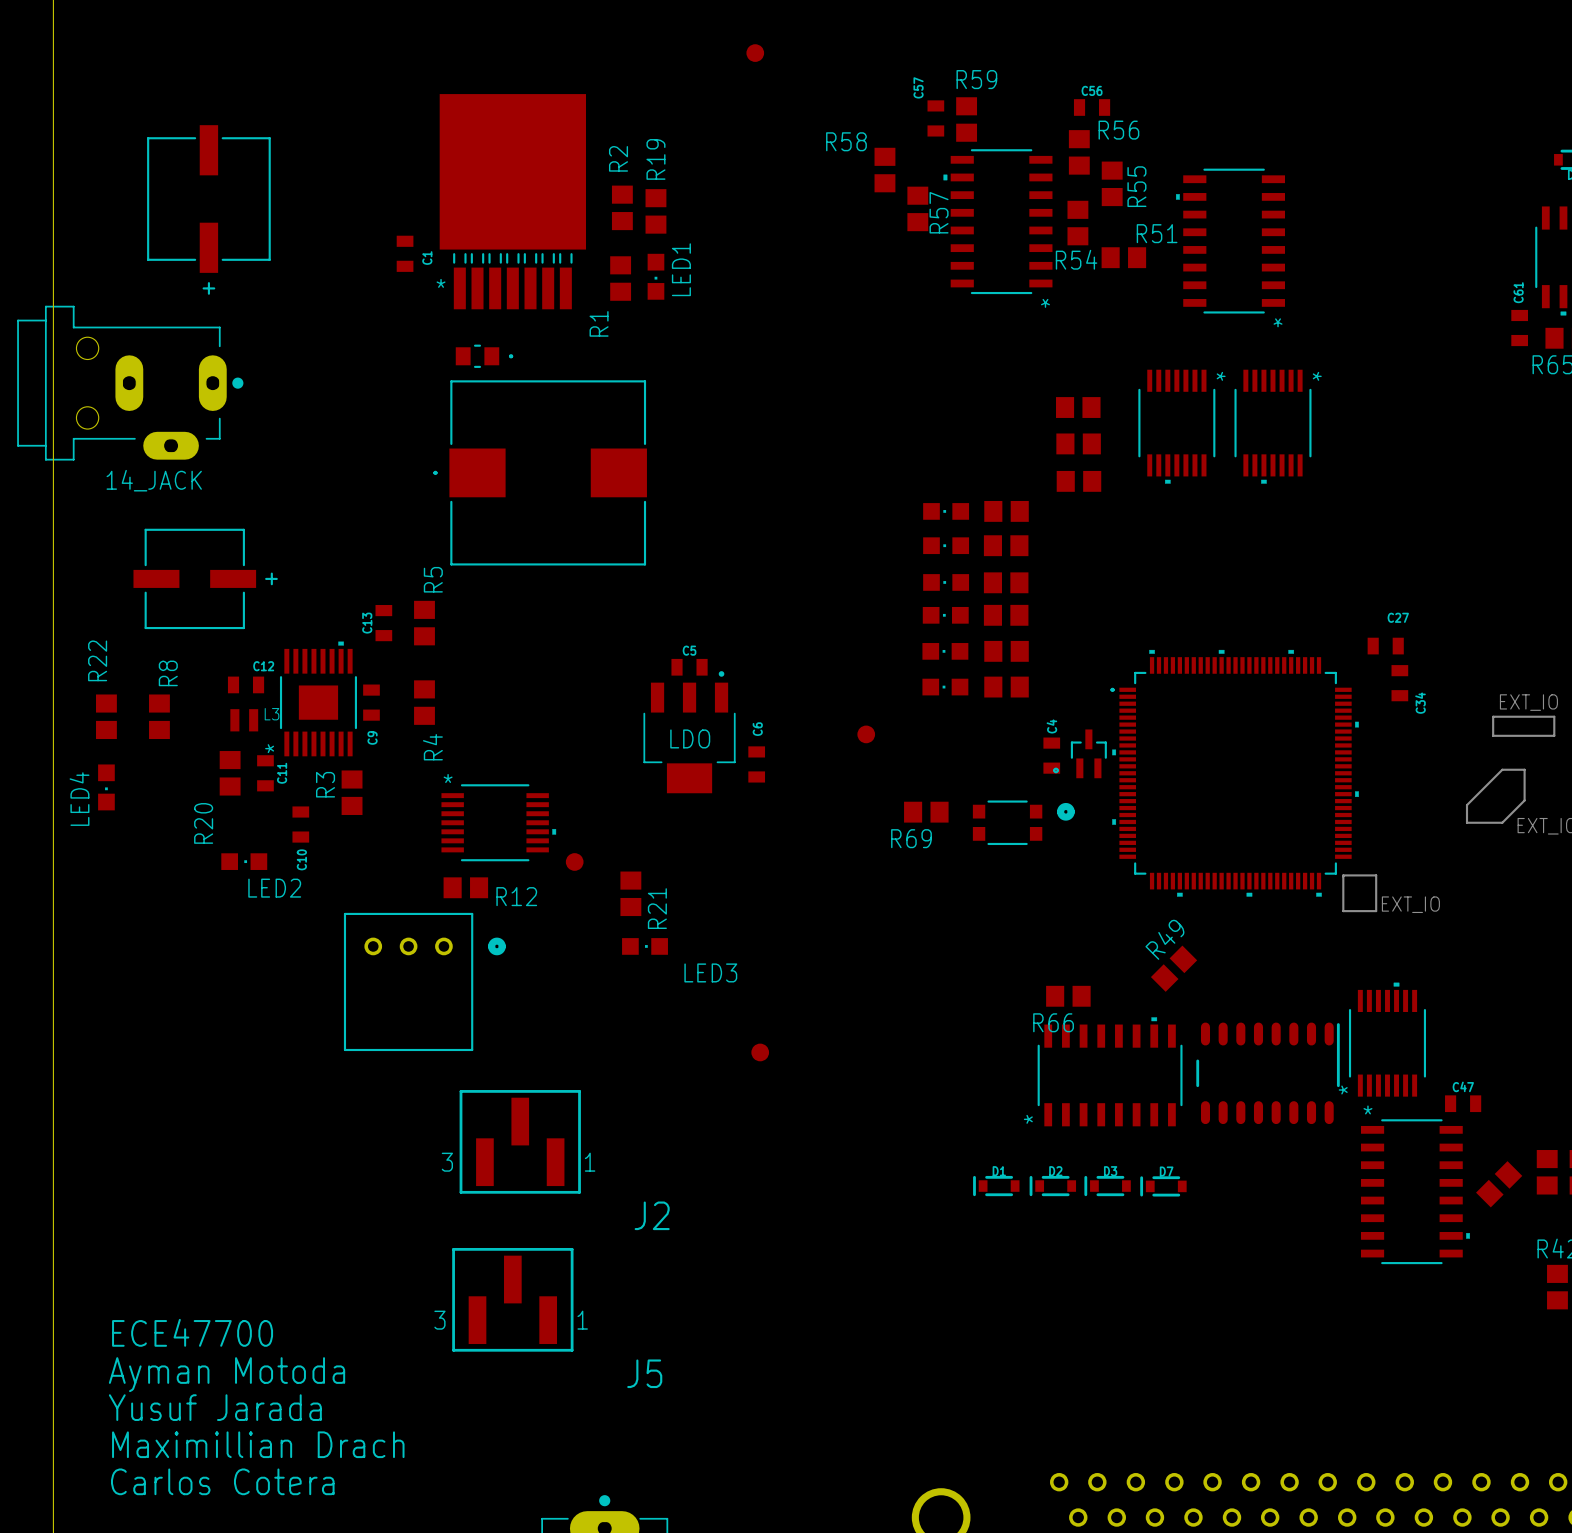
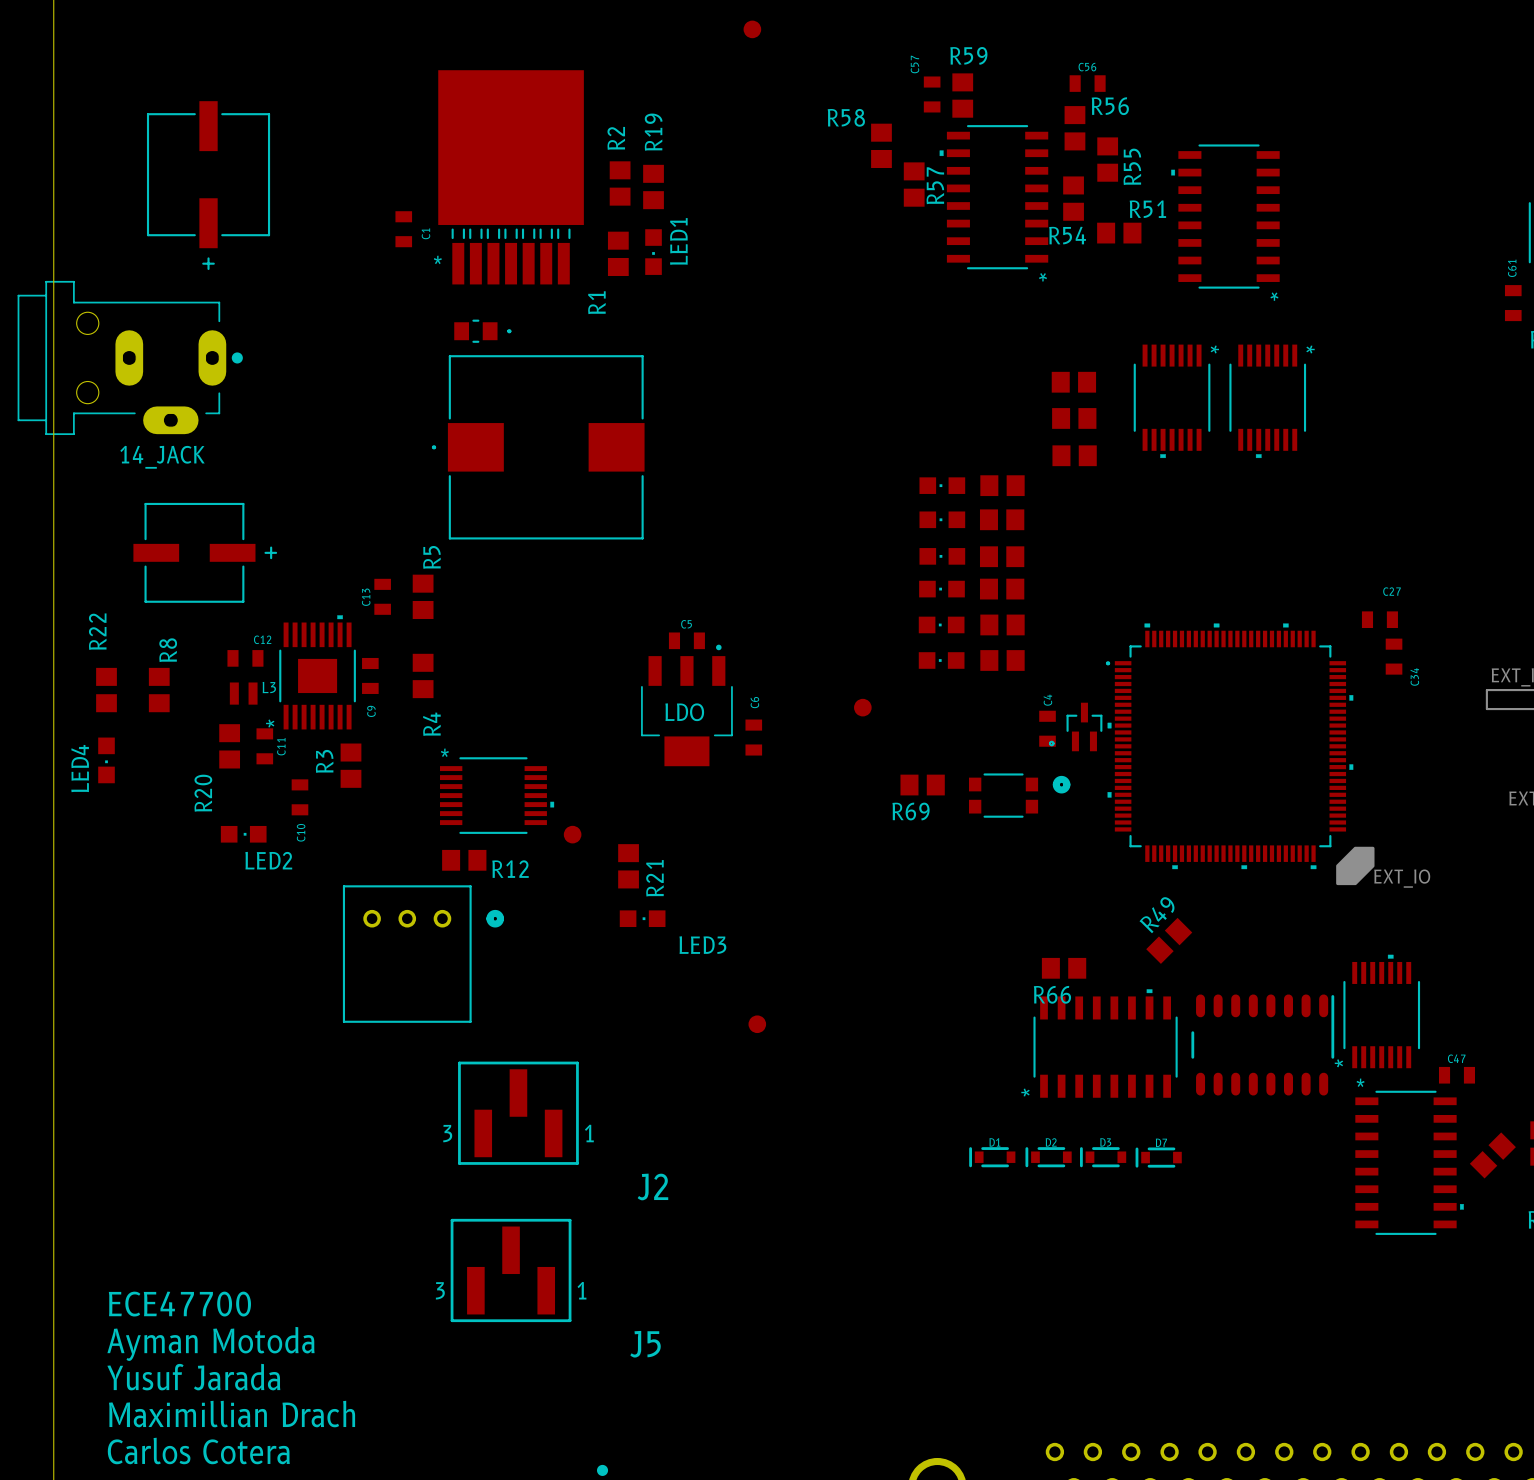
line: (1502, 769) (1524, 769) (1524, 800) (1502, 822) (1467, 822) (1467, 805) (1502, 769) -> none
drawing: none -> [1336, 846, 1375, 886]
line: (1343, 875) (1343, 911) (1376, 911) (1376, 875) (1343, 875) -> none

